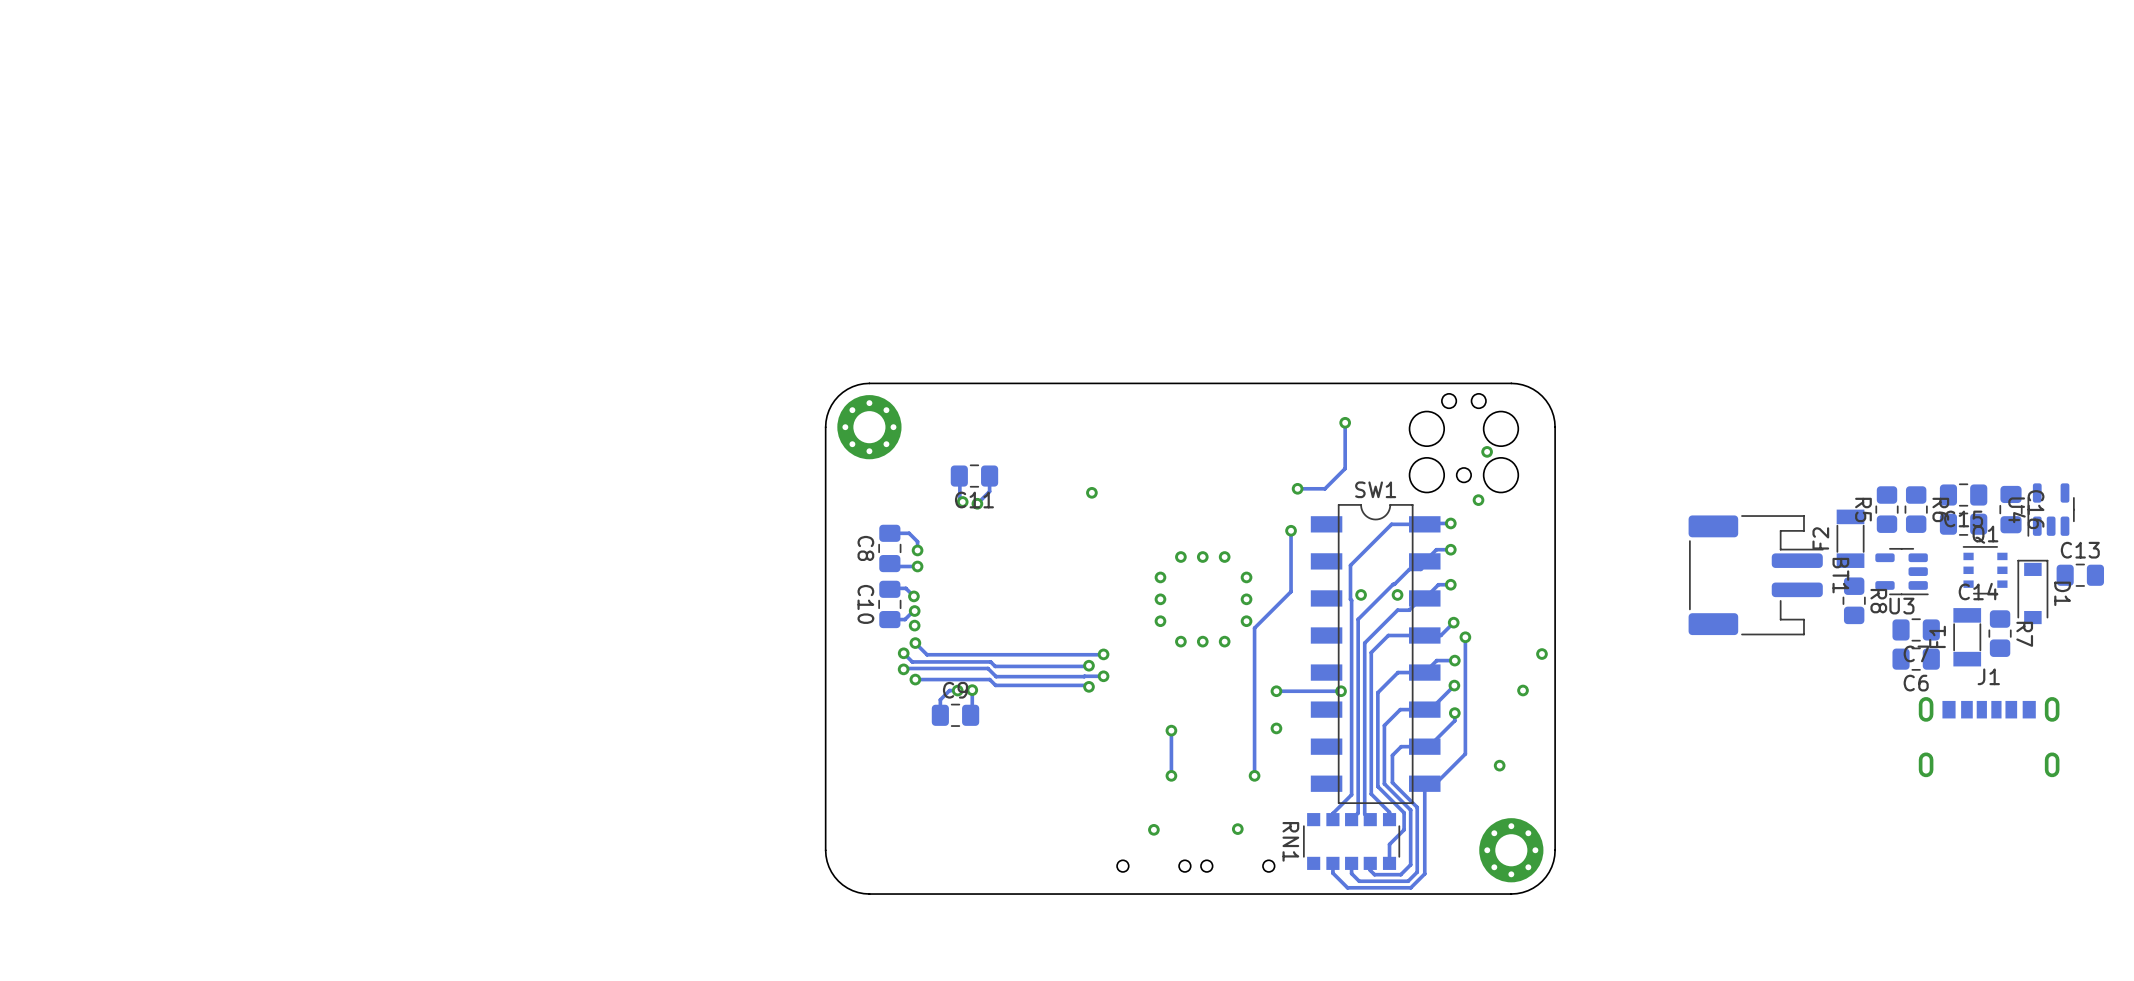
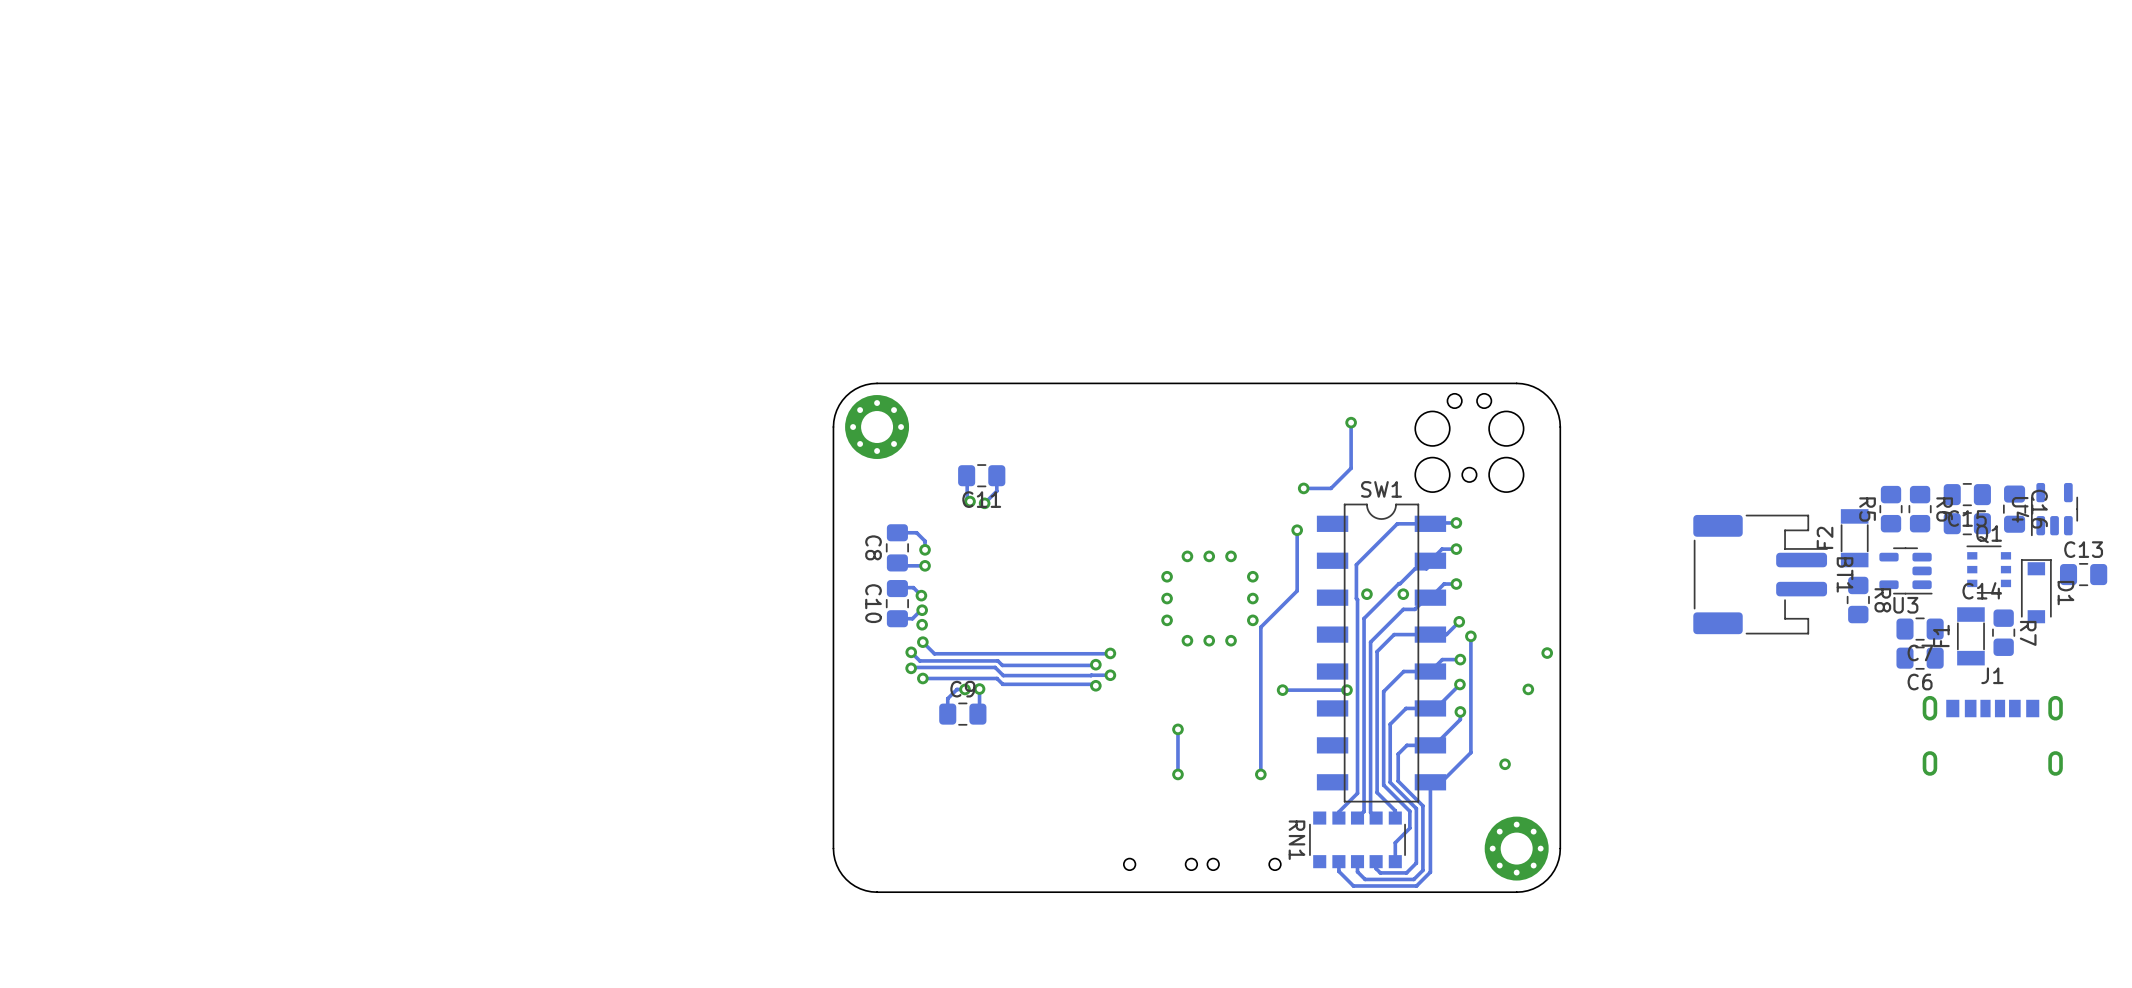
via: (1487, 451) -> none
via: (1091, 492) -> none
via: (1478, 500) -> none
via: (1276, 728) -> none
via: (1153, 829) -> none
via: (1237, 829) -> none

